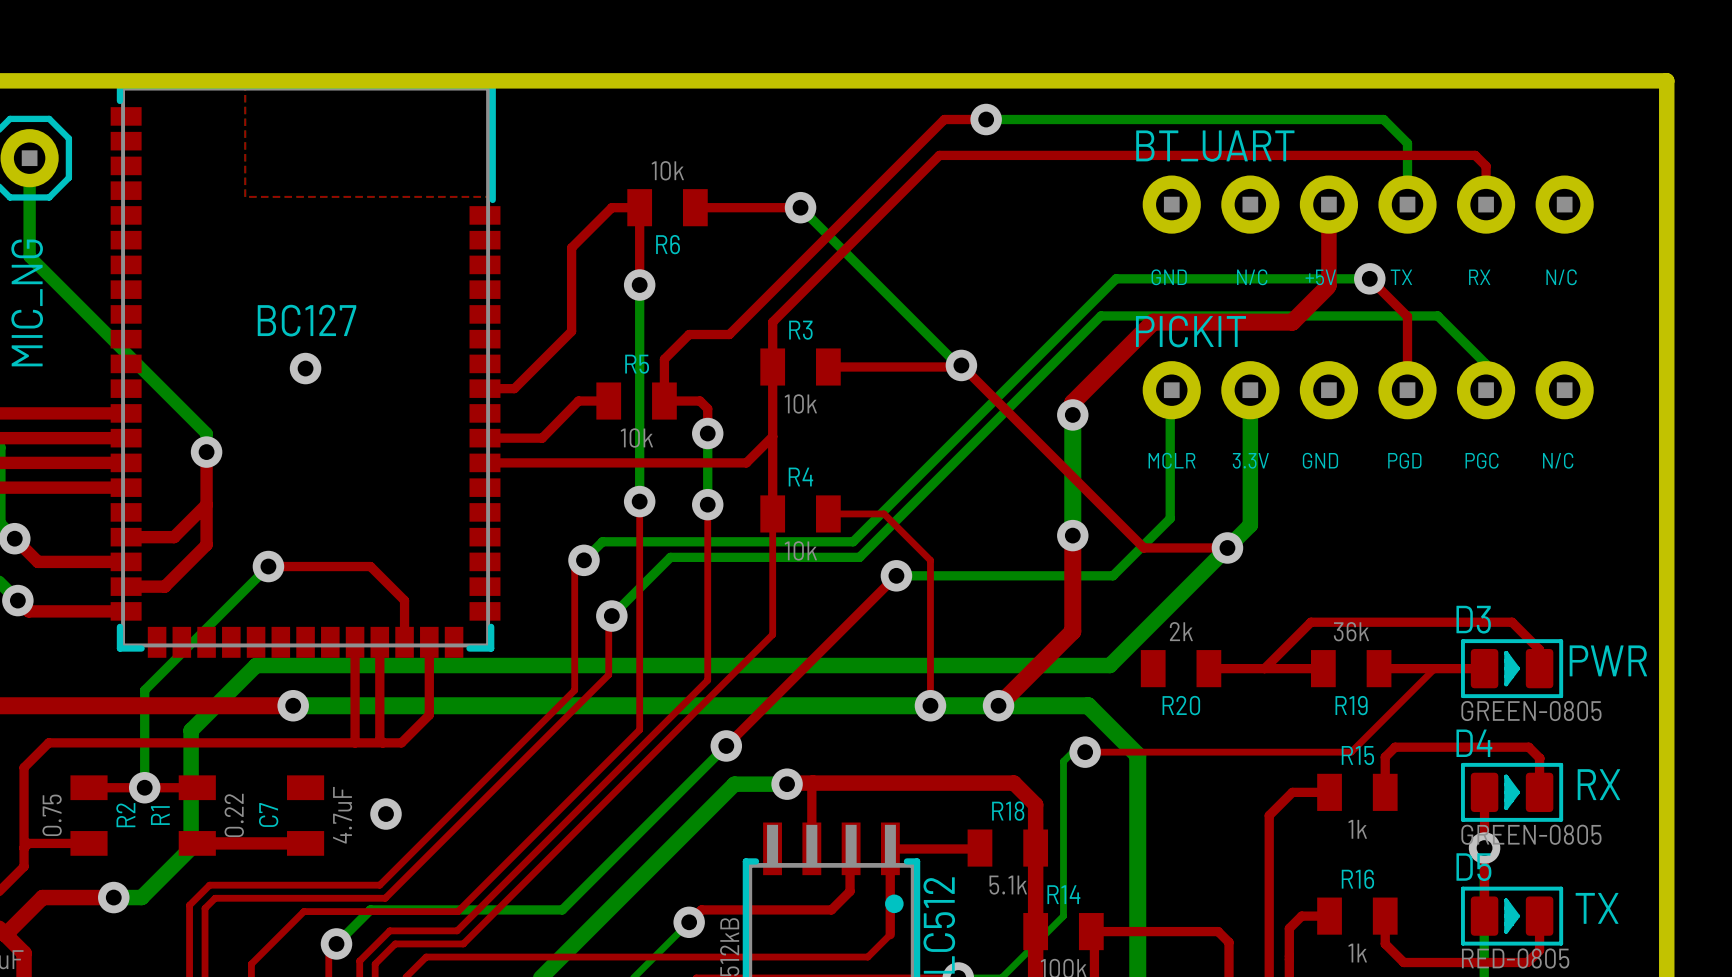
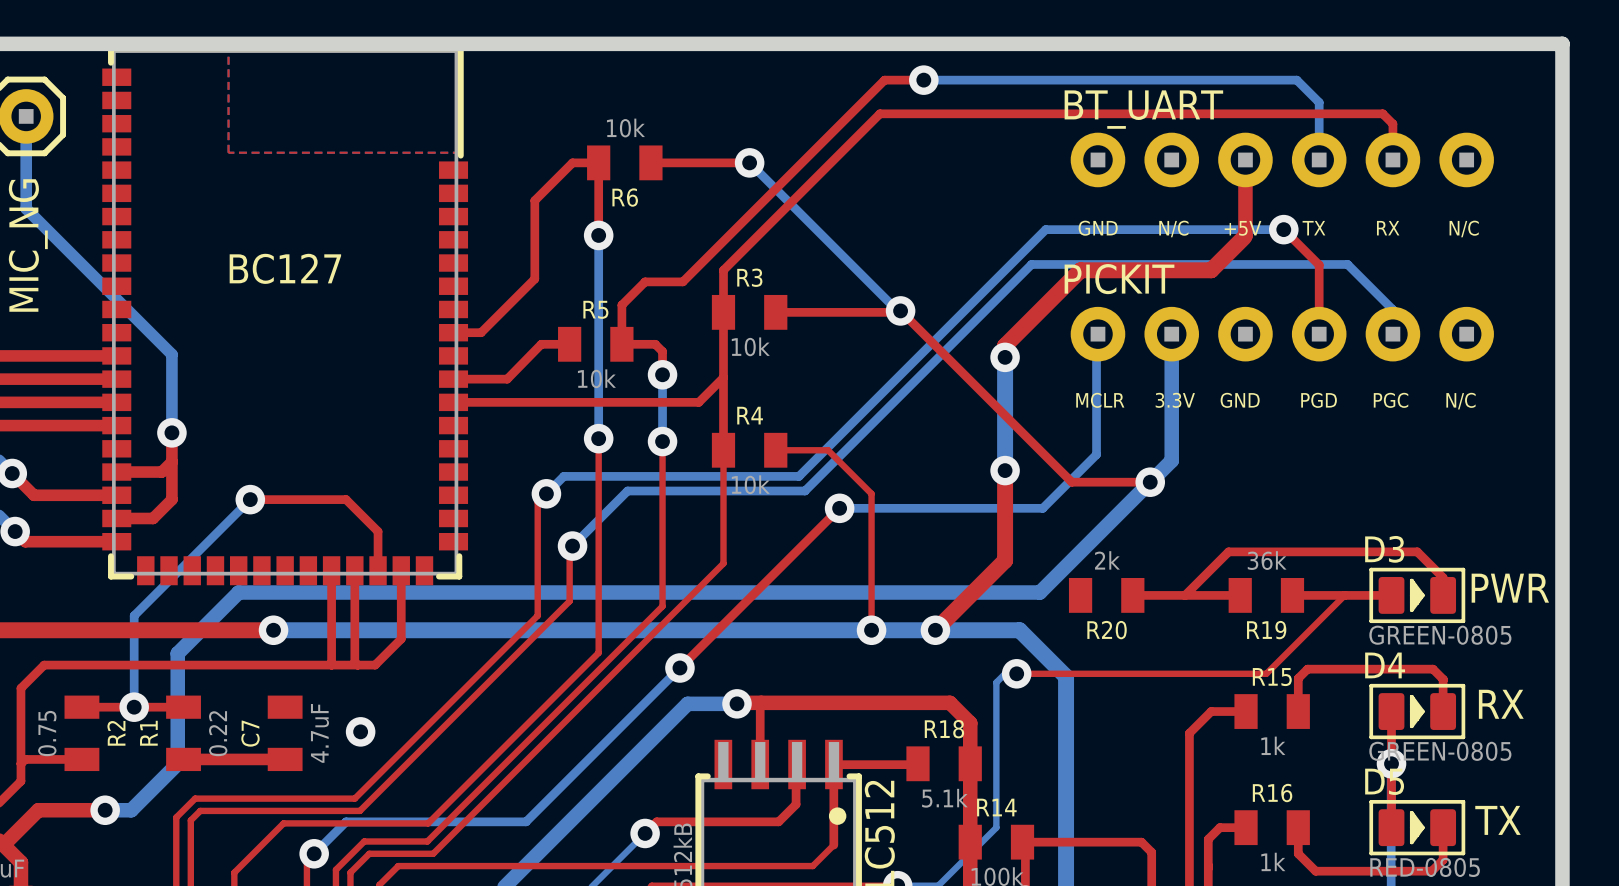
via: (305, 368) -> none
bottom track: (184, 411) (206, 433) (206, 452) -> (171, 354) (171, 432)
top track: (206, 452) (206, 544) (184, 566) -> (171, 432) (171, 499)
via position: (206, 452) -> (171, 432)
top track: (206, 504) (184, 526) -> none

